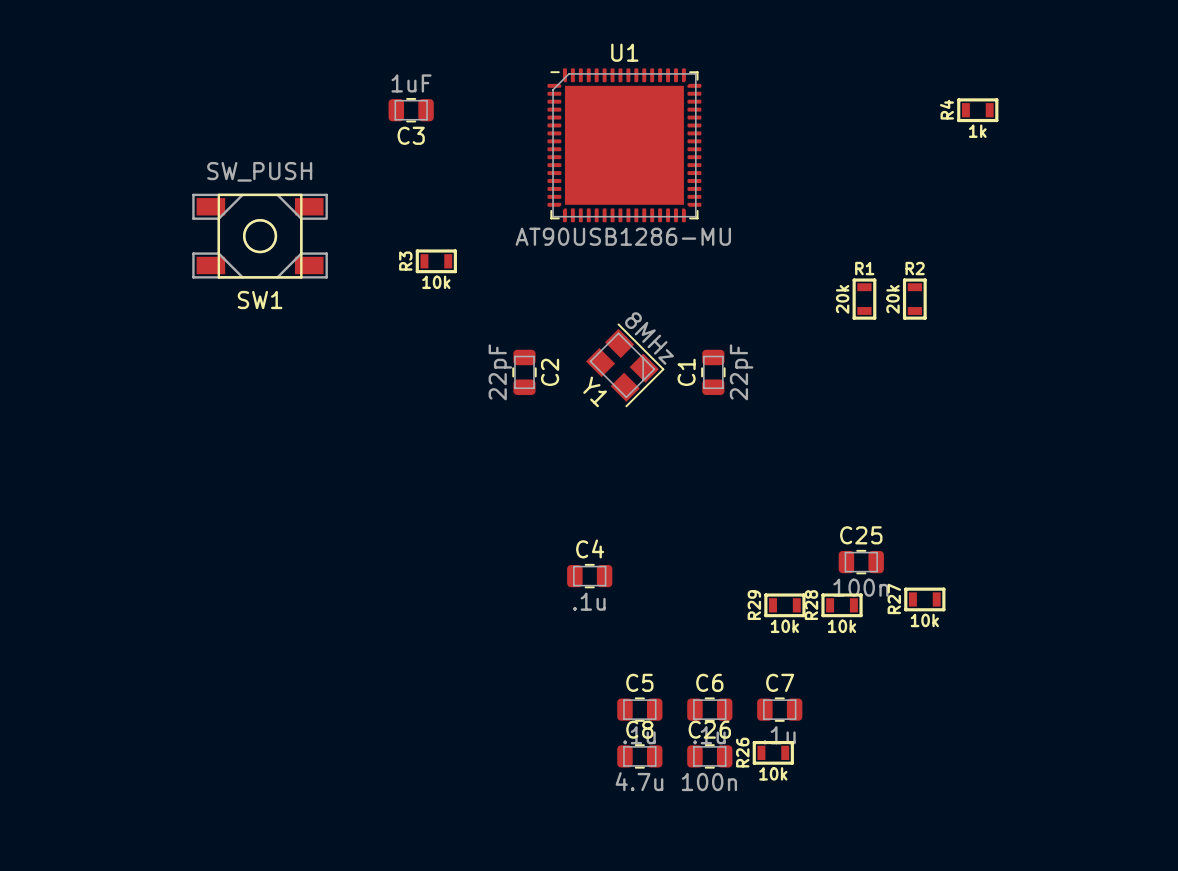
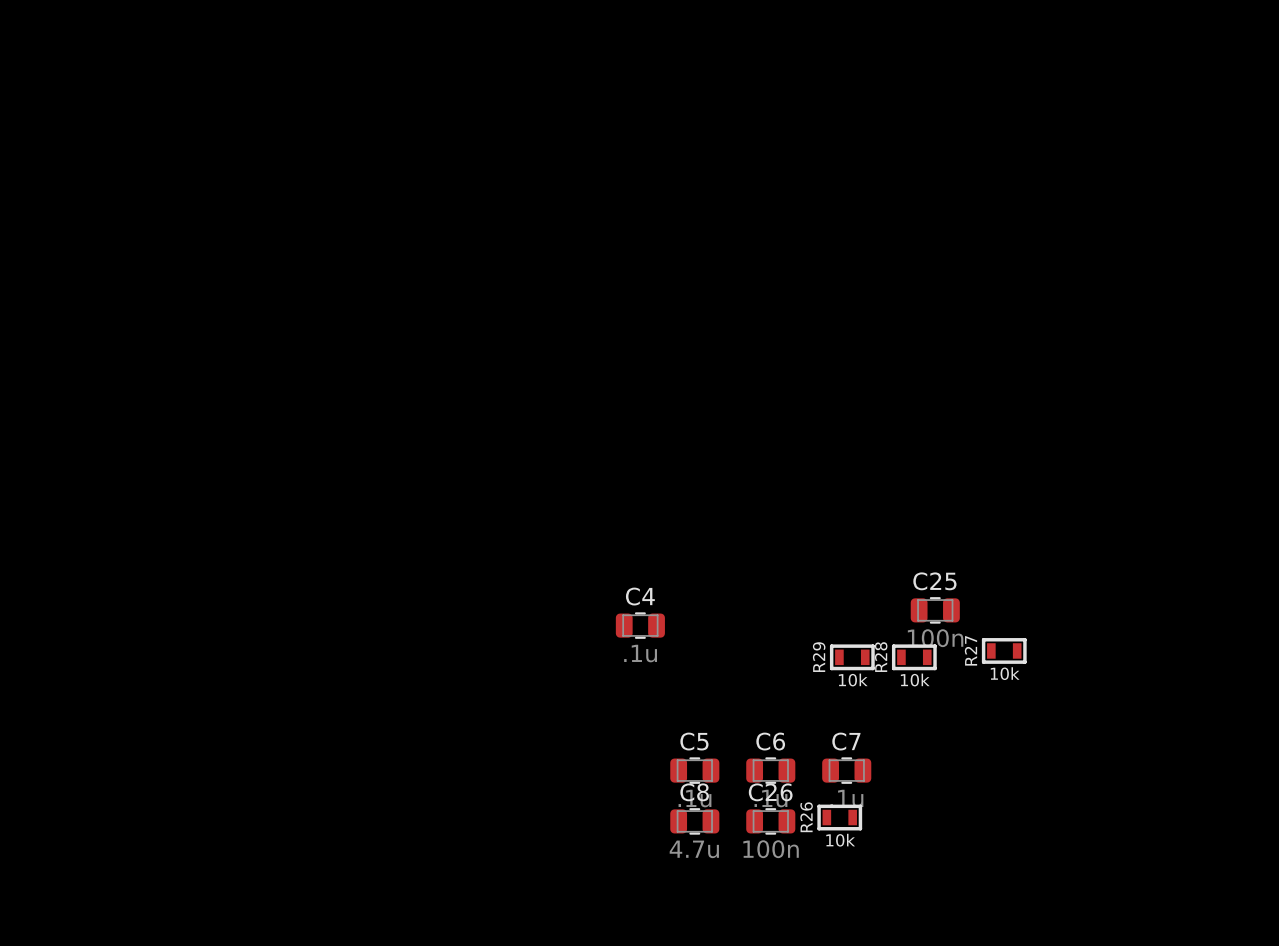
C3: 1uF (411, 110) -> none
R4: 1k (977, 110) -> none
U1: AT90USB1286-MU (624, 145) -> none
SW1: SW_PUSH (260, 236) -> none
R3: 10k (436, 261) -> none
R1: 20k (864, 299) -> none
R2: 20k (914, 299) -> none
Y1: 8MHz (625, 365) -> none
C2: 22pF (524, 372) -> none
C1: 22pF (713, 372) -> none

